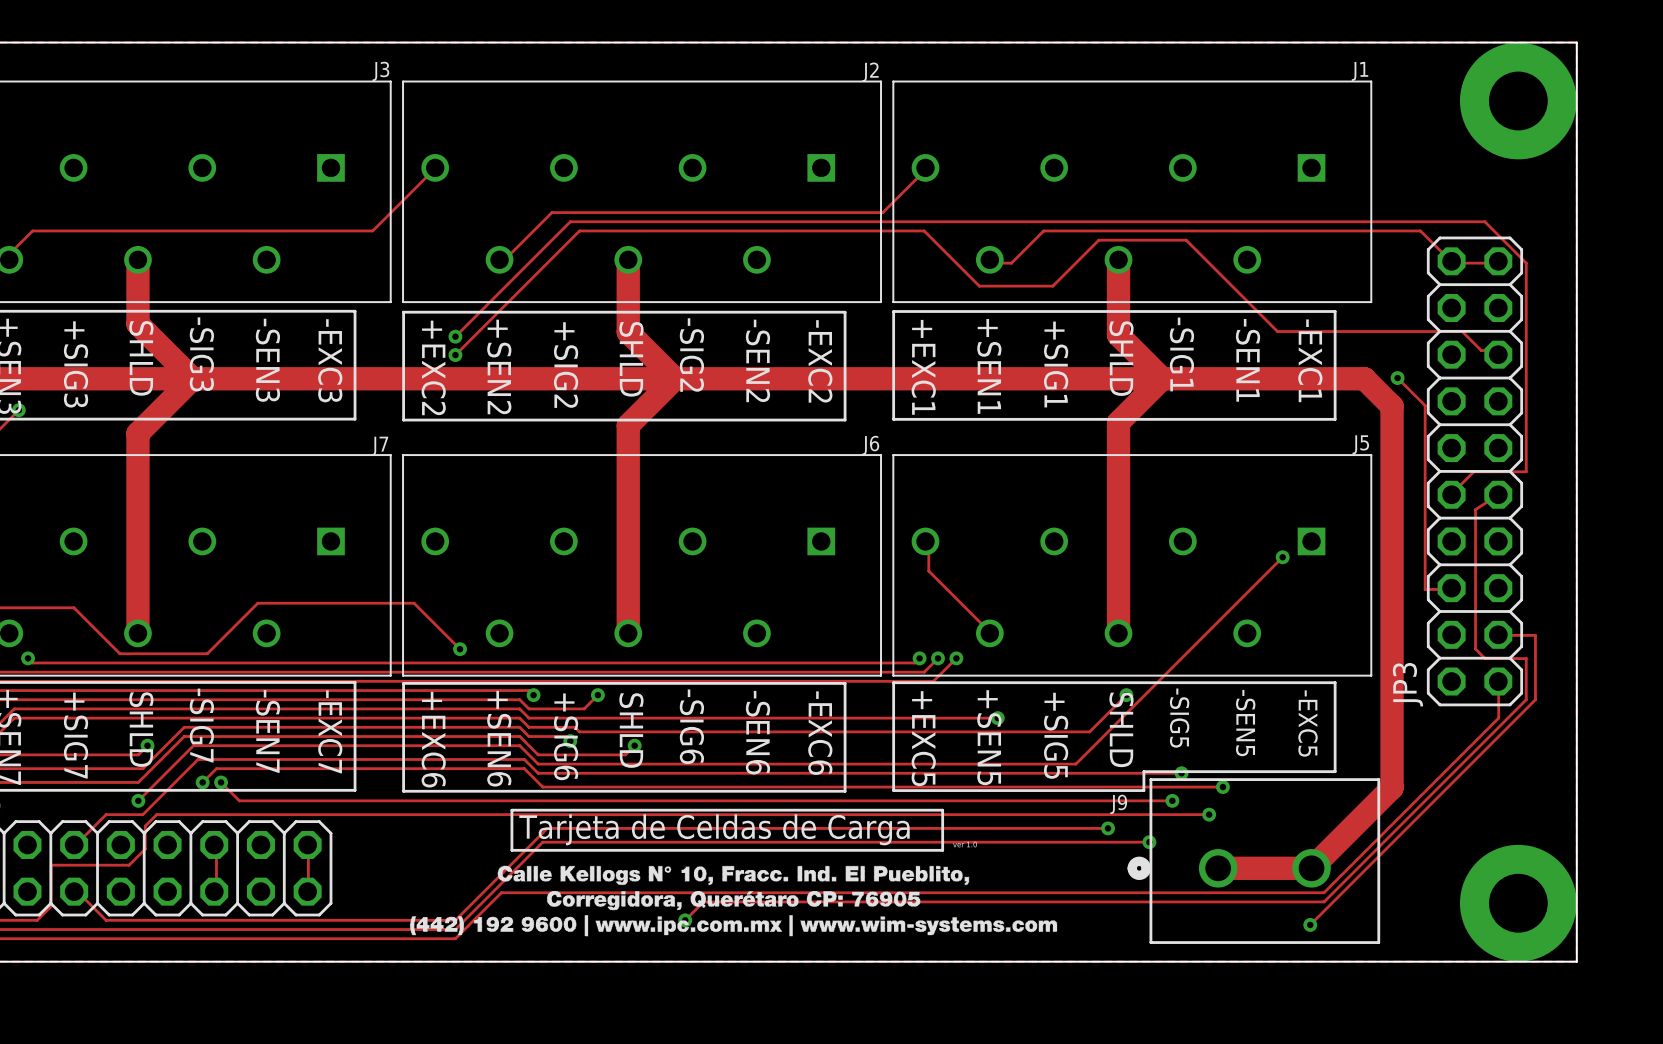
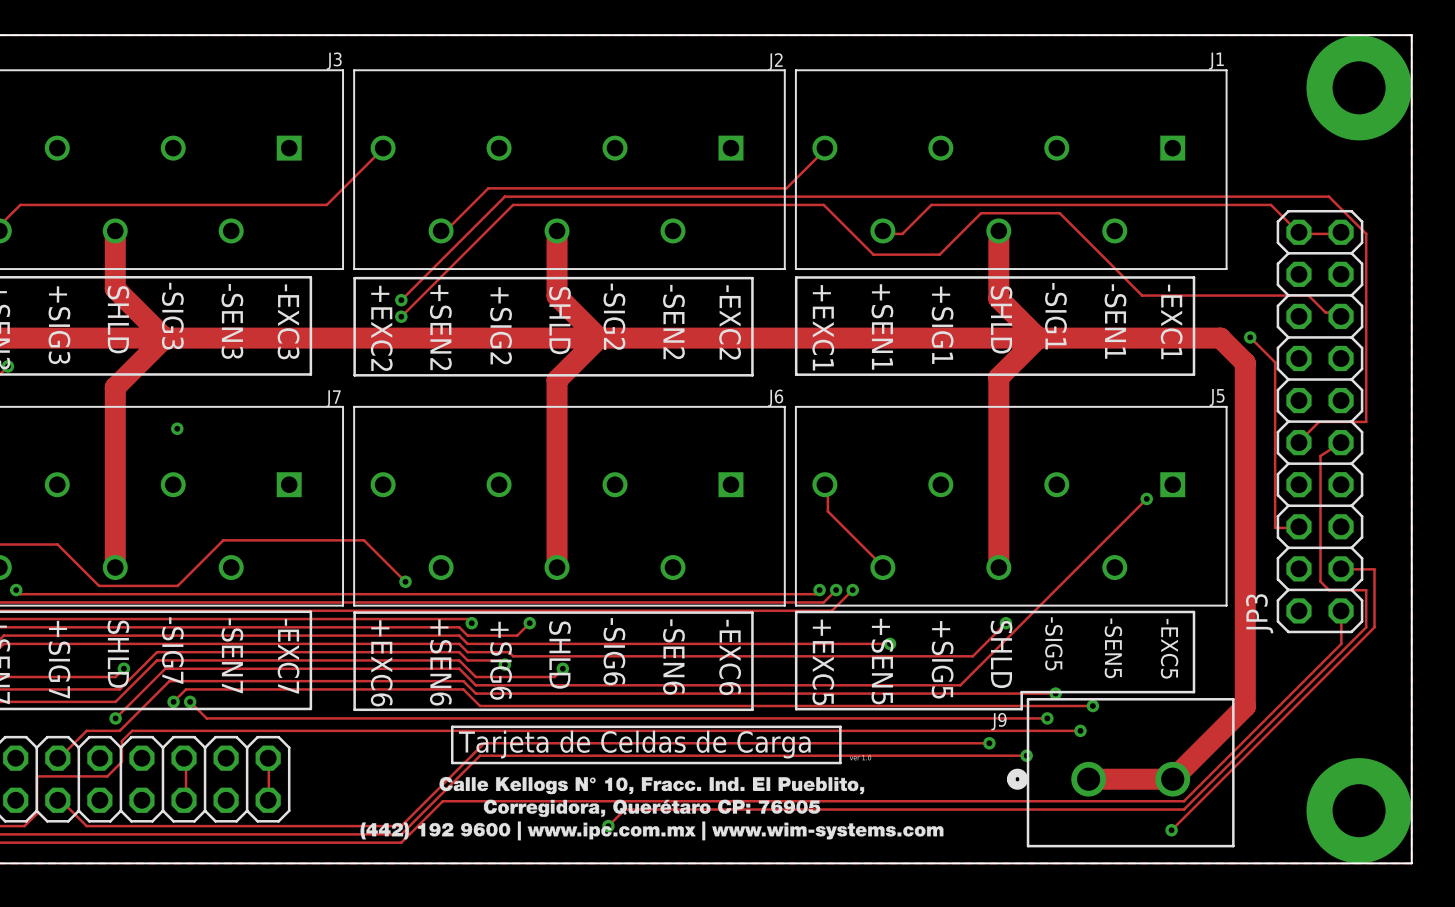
via: none -> (177, 428)

